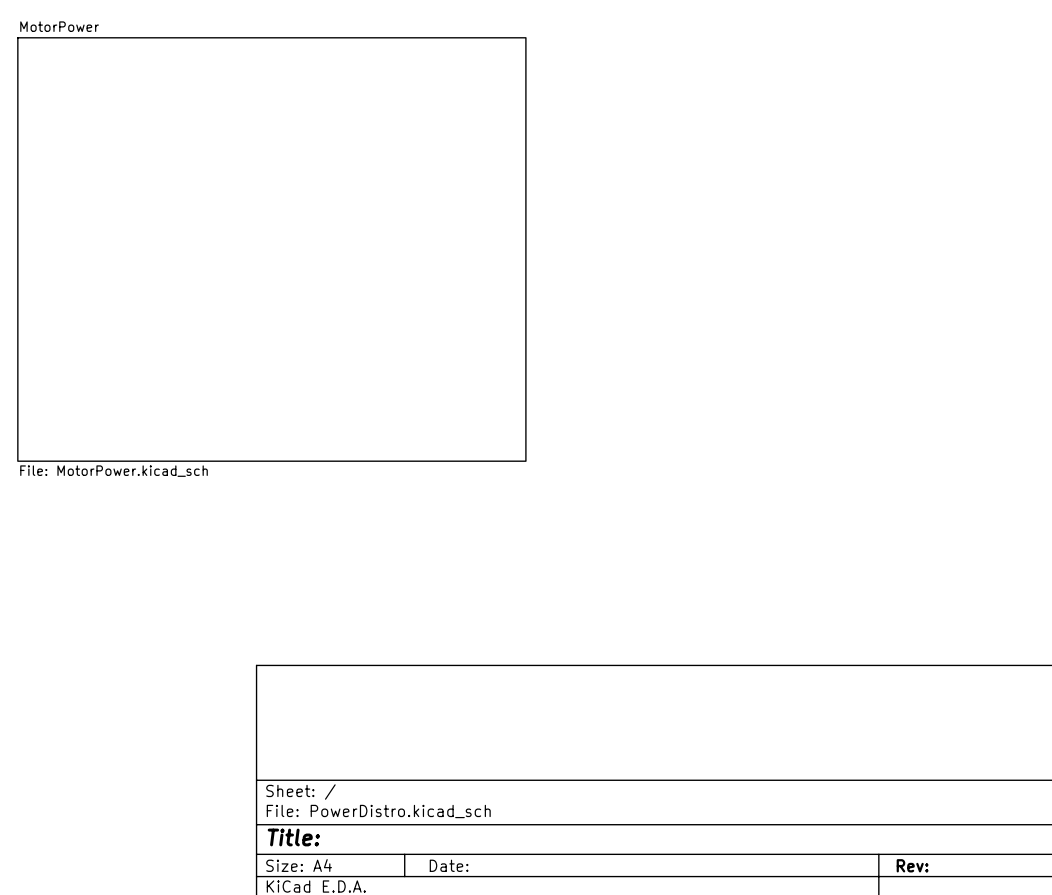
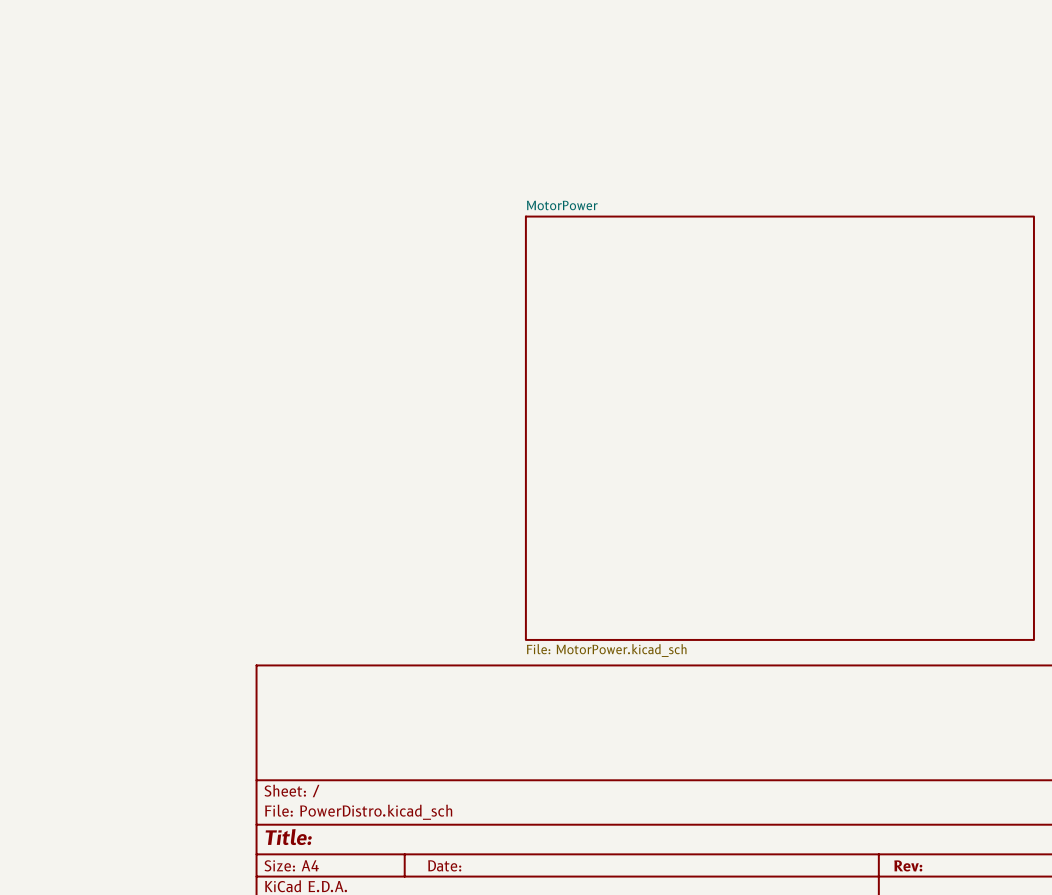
sheet MotorPower: File: MotorPower.kicad_sch (271, 249) -> none
sheet MotorPower: none -> File: MotorPower.kicad_sch (779, 428)

